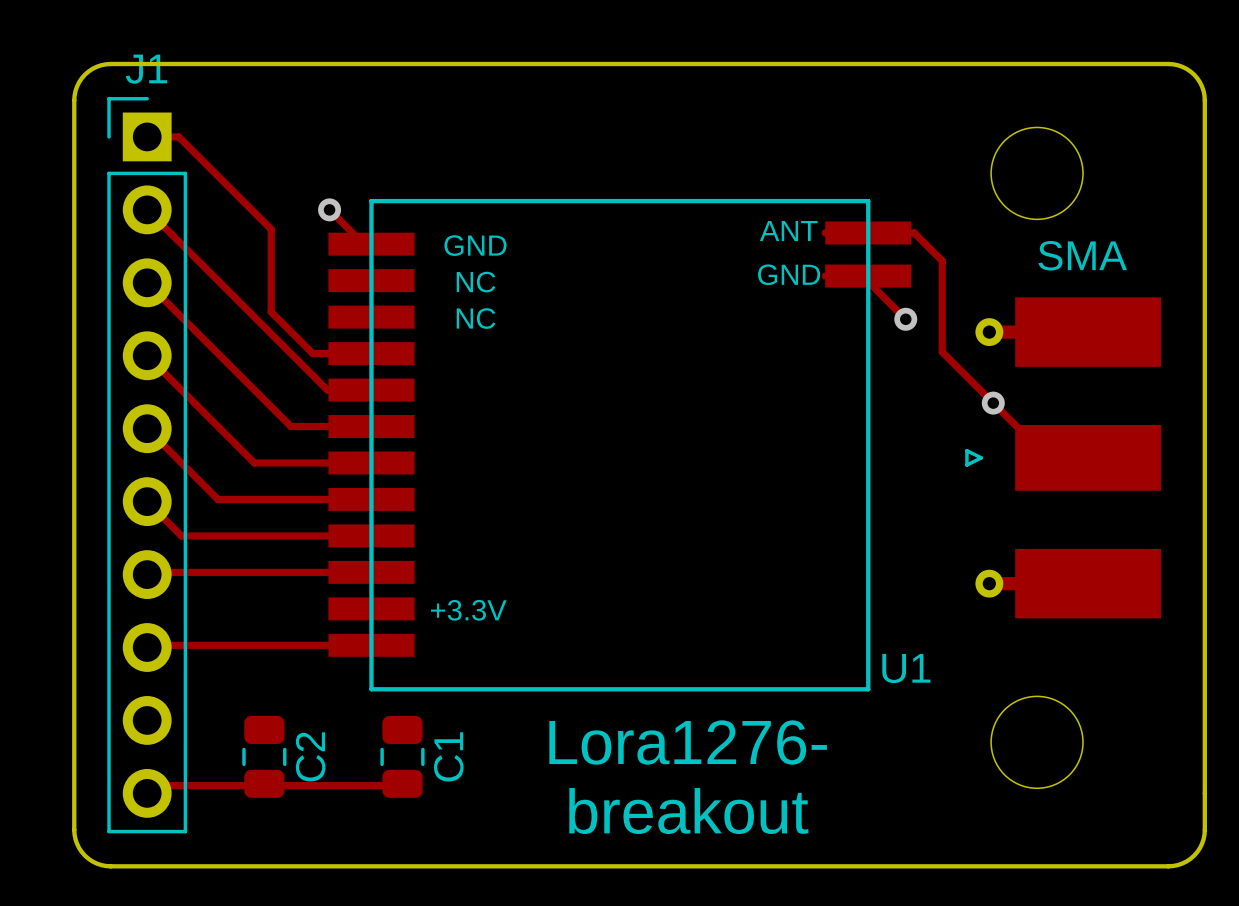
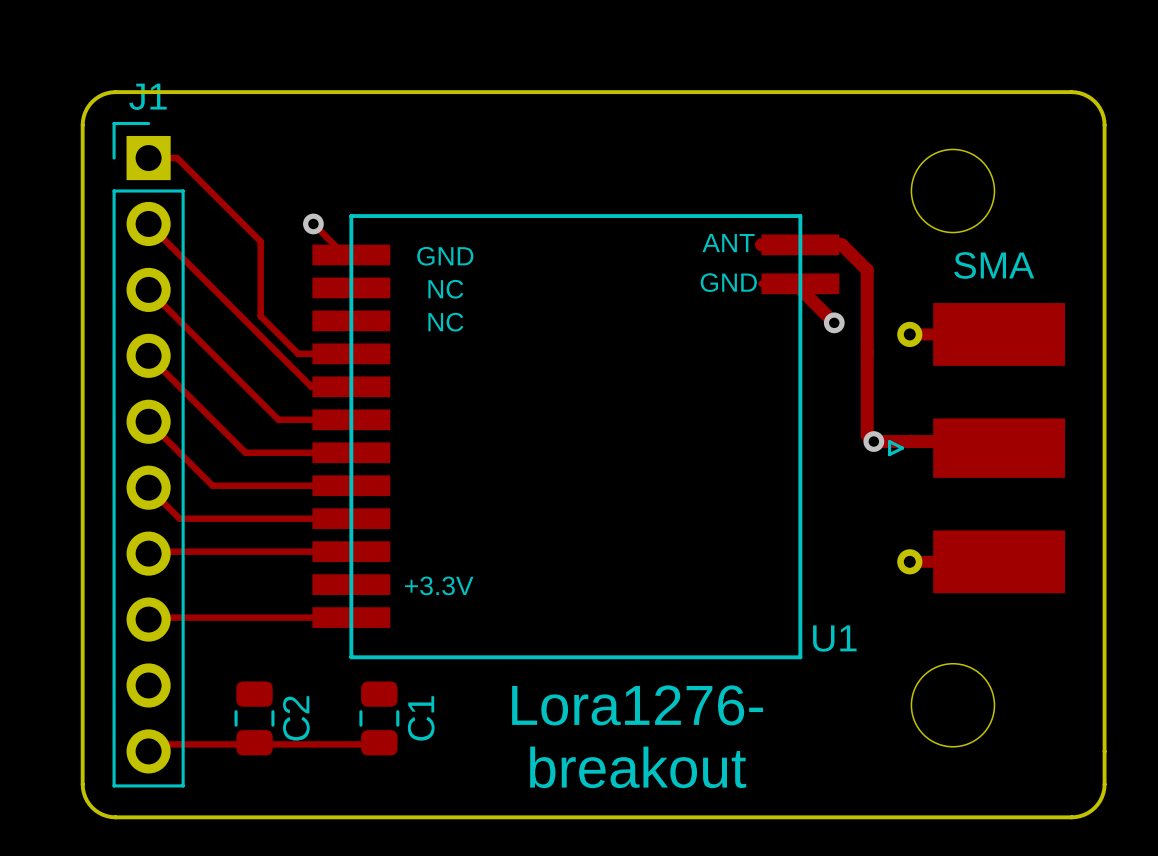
track width: thin (825, 232) (914, 232) (942, 260) (942, 352) -> thick (761, 244) (841, 244) (867, 270) (867, 352)
track width: thin (862, 276) (905, 319) -> thick (795, 283) (834, 322)
track: (942, 352) (1048, 457) (1088, 457) -> (867, 352) (867, 434) (873, 441) (992, 441) (999, 448)
via position: (993, 403) -> (873, 441)

